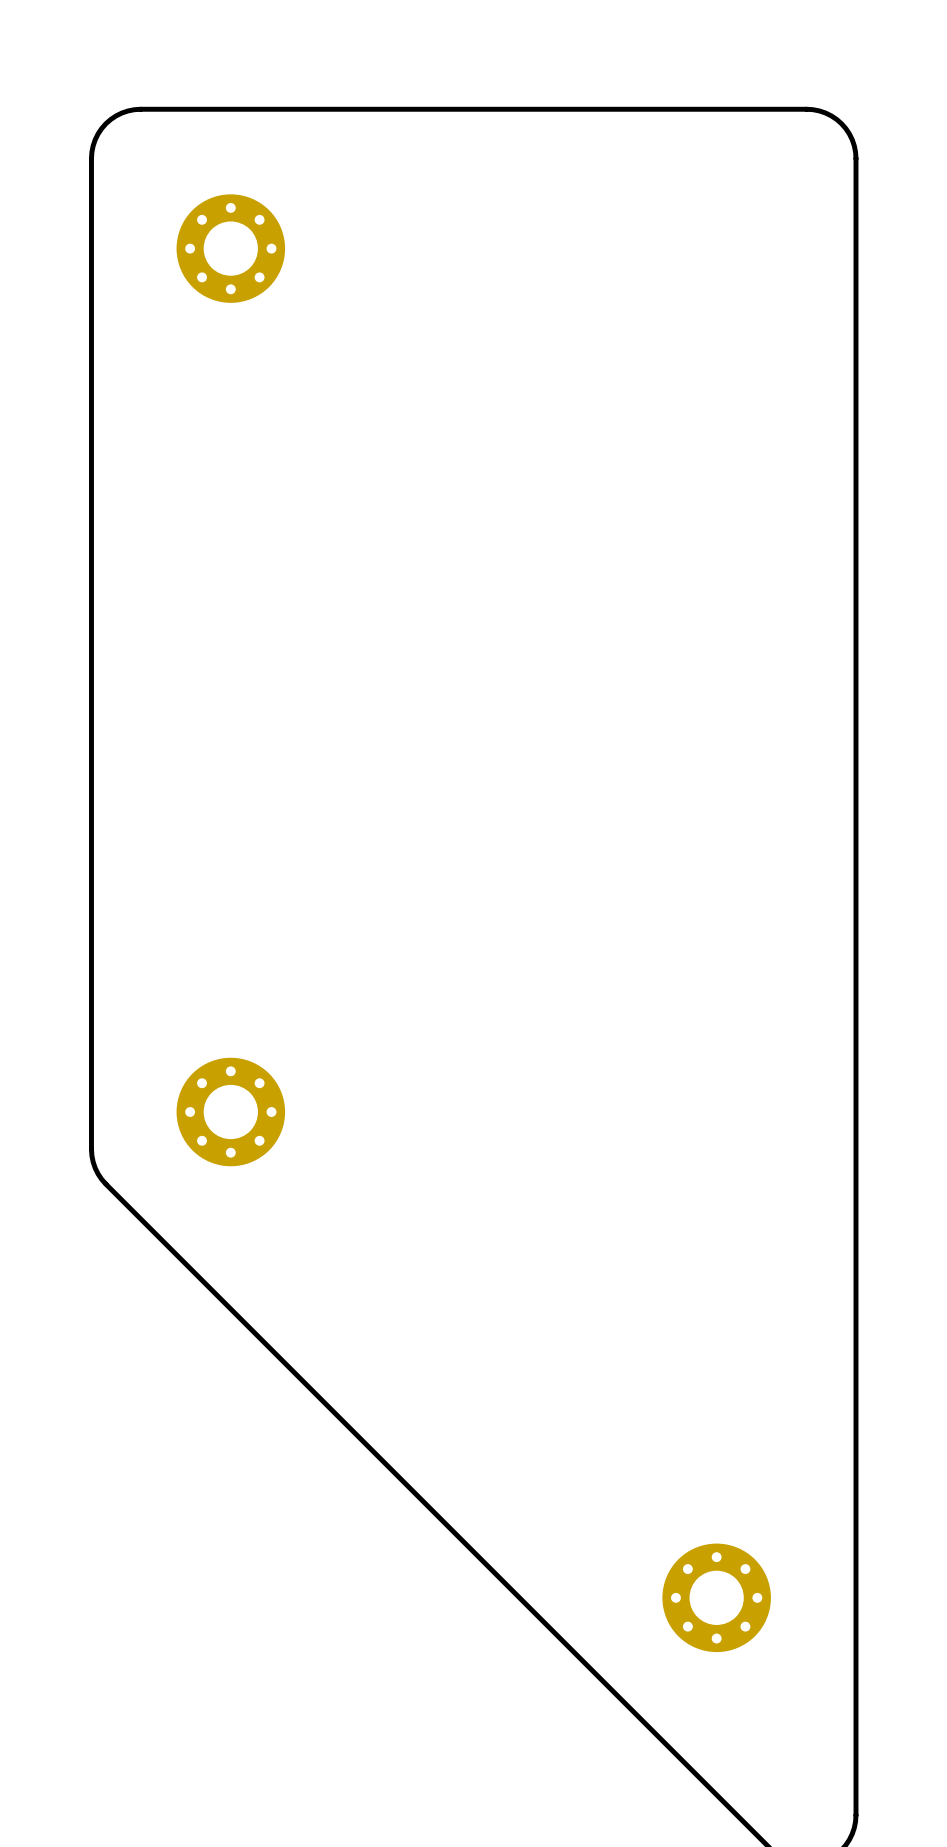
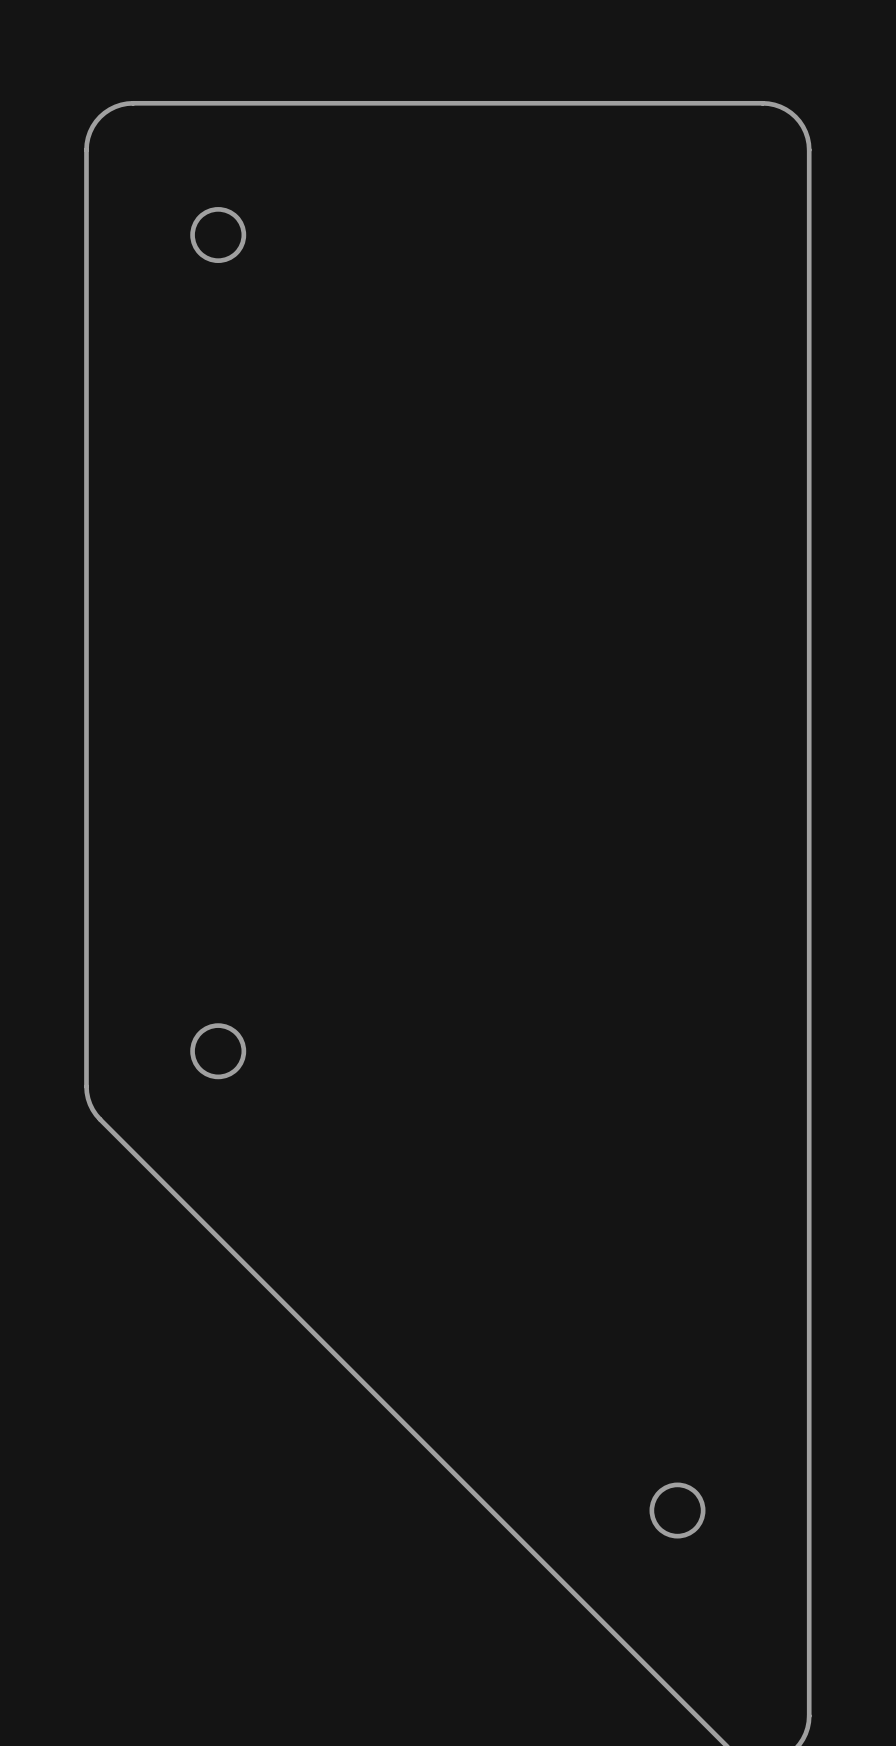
round board edge: none -> [190, 207, 247, 264]
part: (230, 248) -> none
round board edge: none -> [190, 1023, 247, 1080]
part: (230, 1112) -> none
round board edge: none -> [649, 1482, 706, 1539]
part: (716, 1597) -> none

